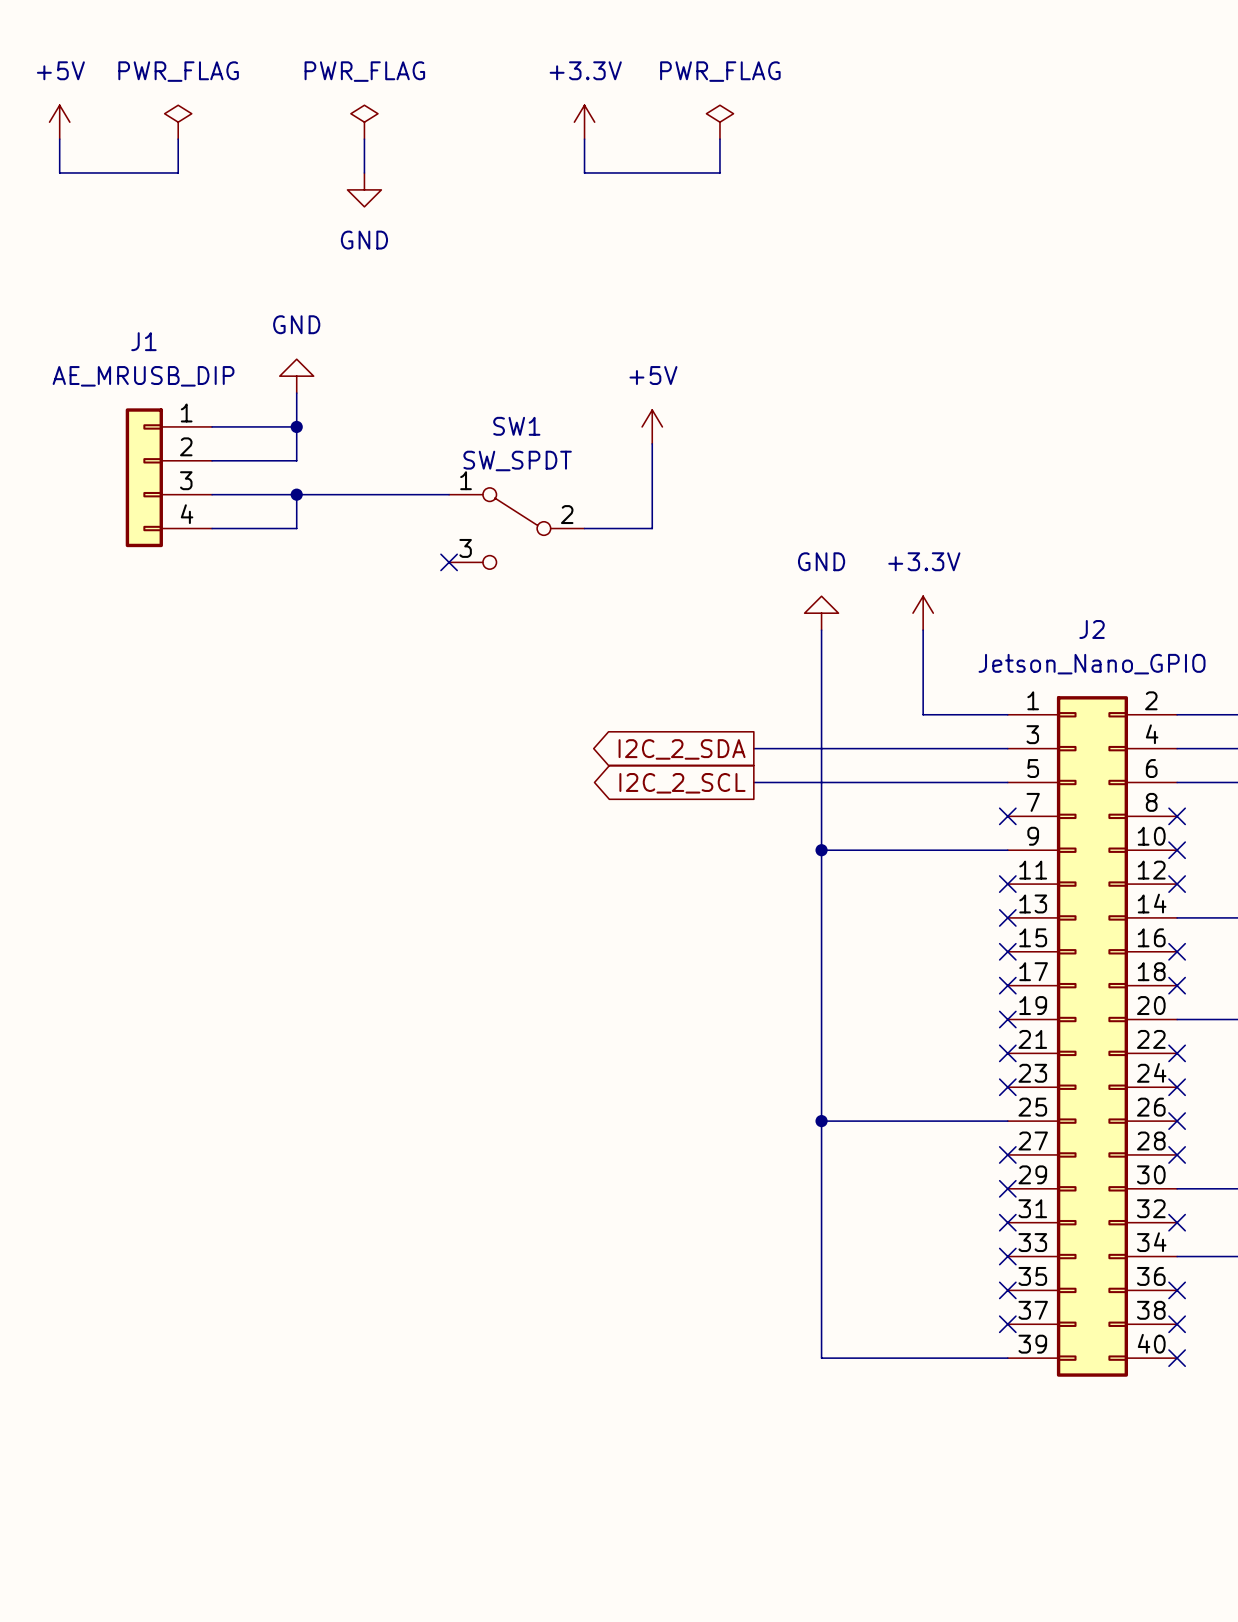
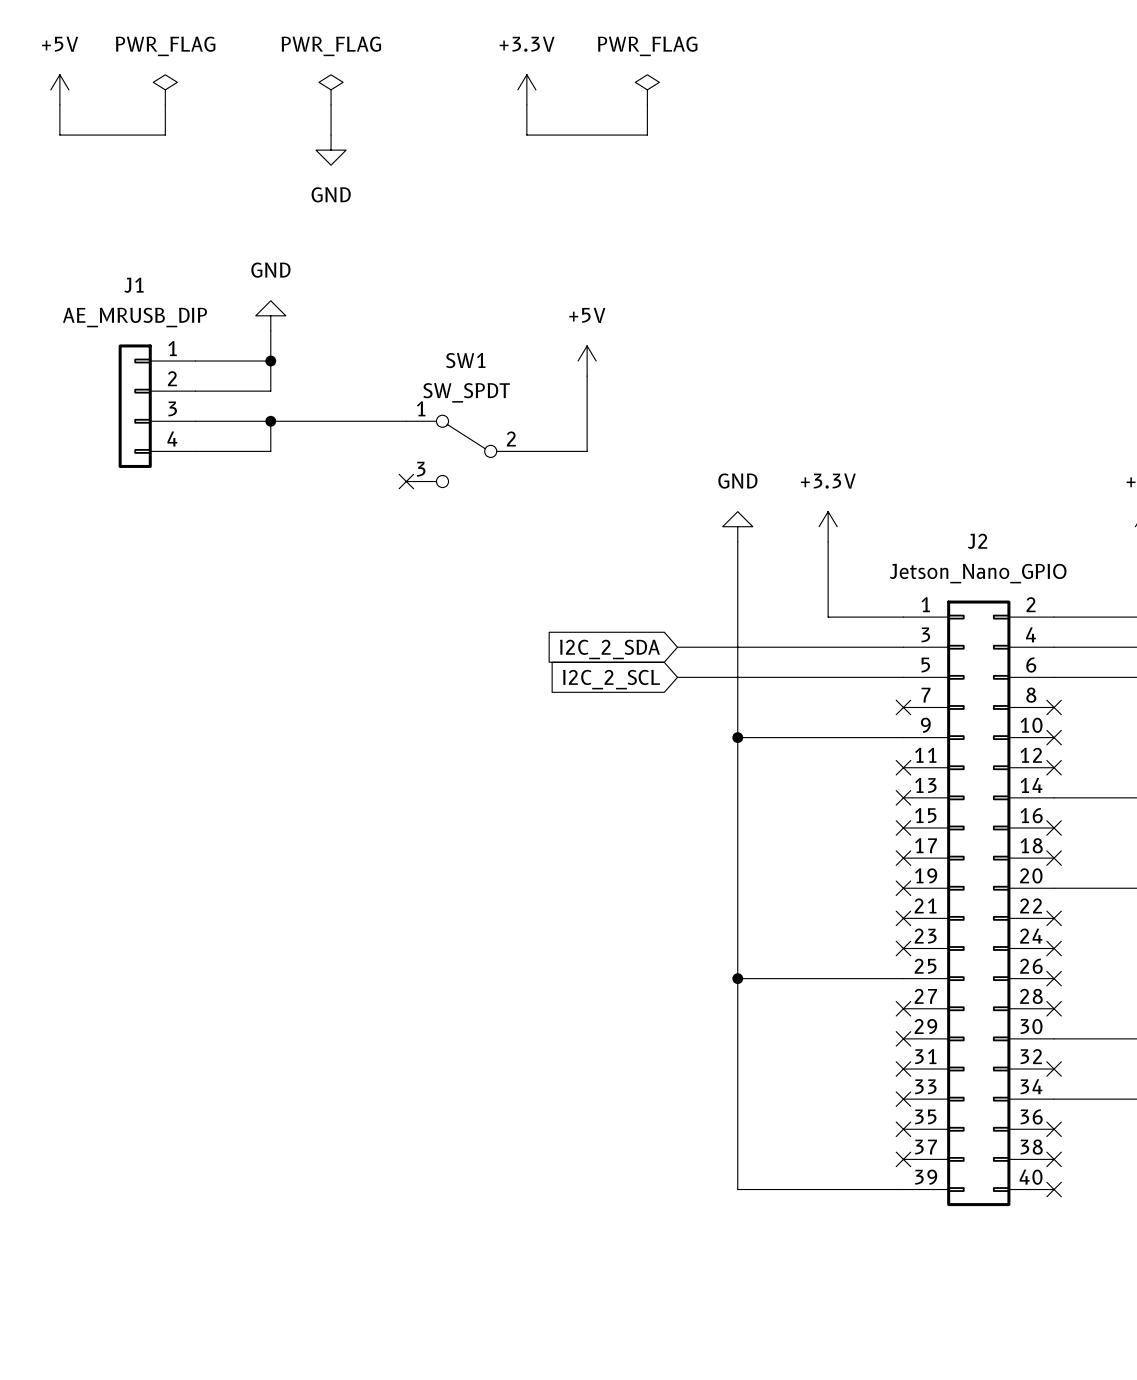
global label shape: output (682, 749) -> input (609, 649)
global label shape: output (682, 783) -> input (611, 679)

